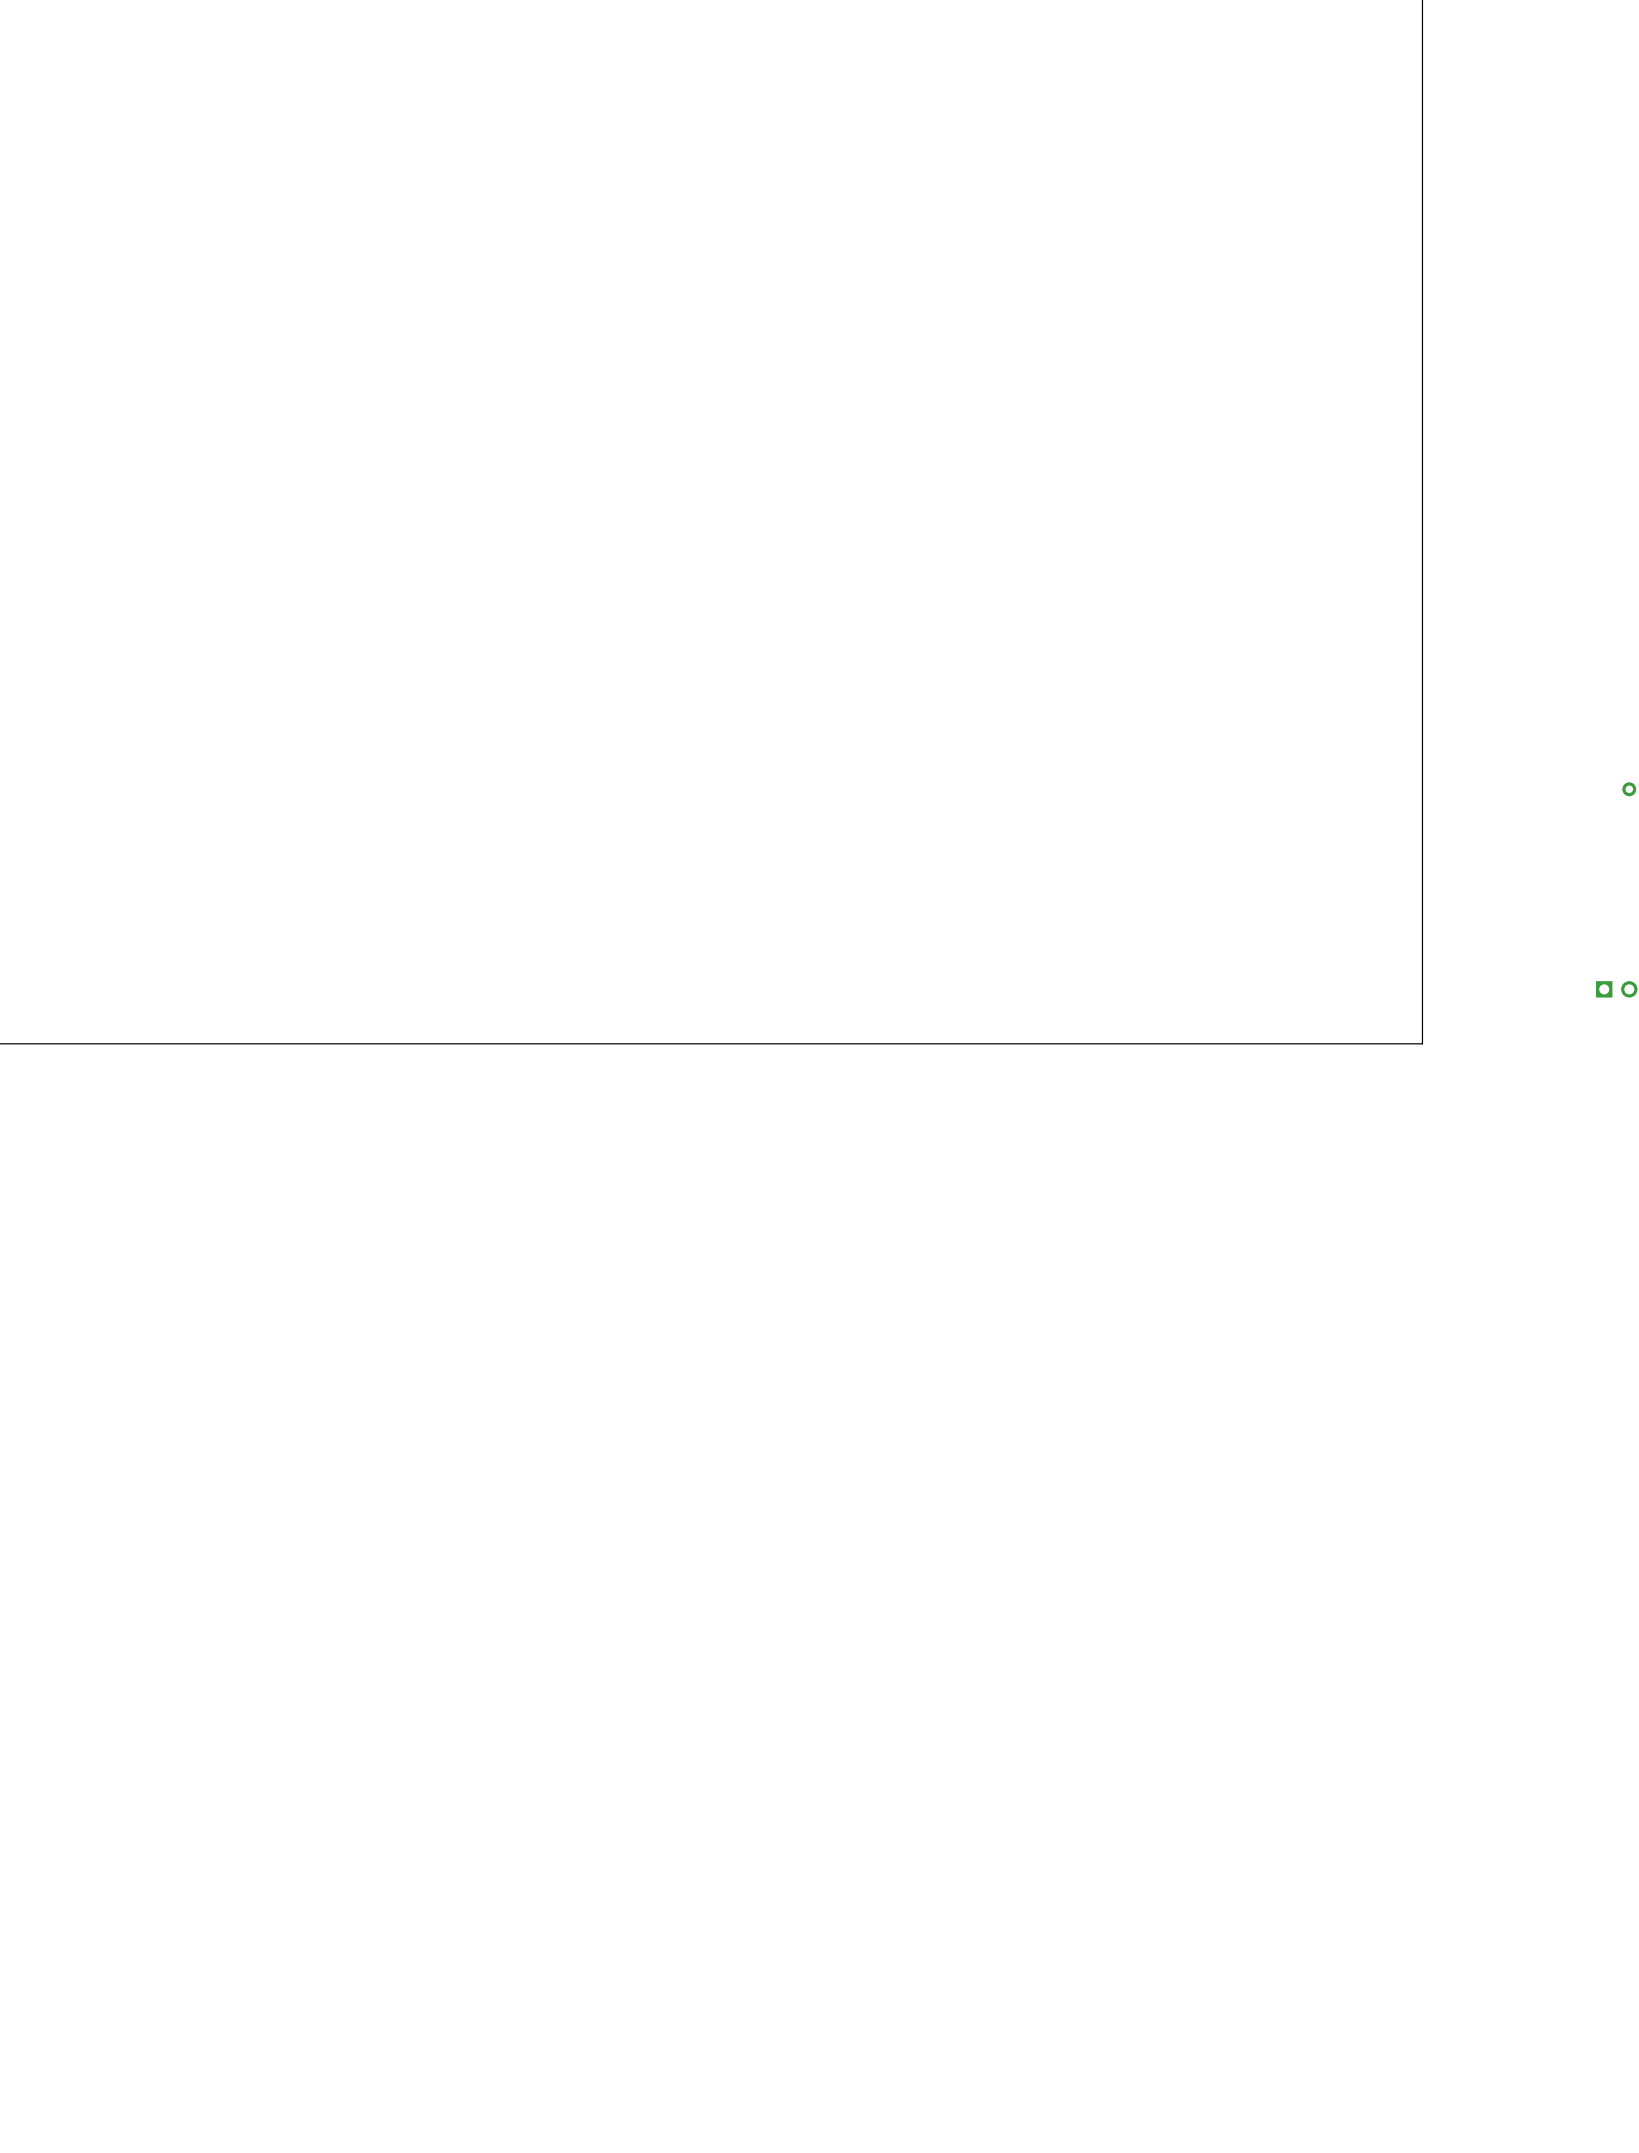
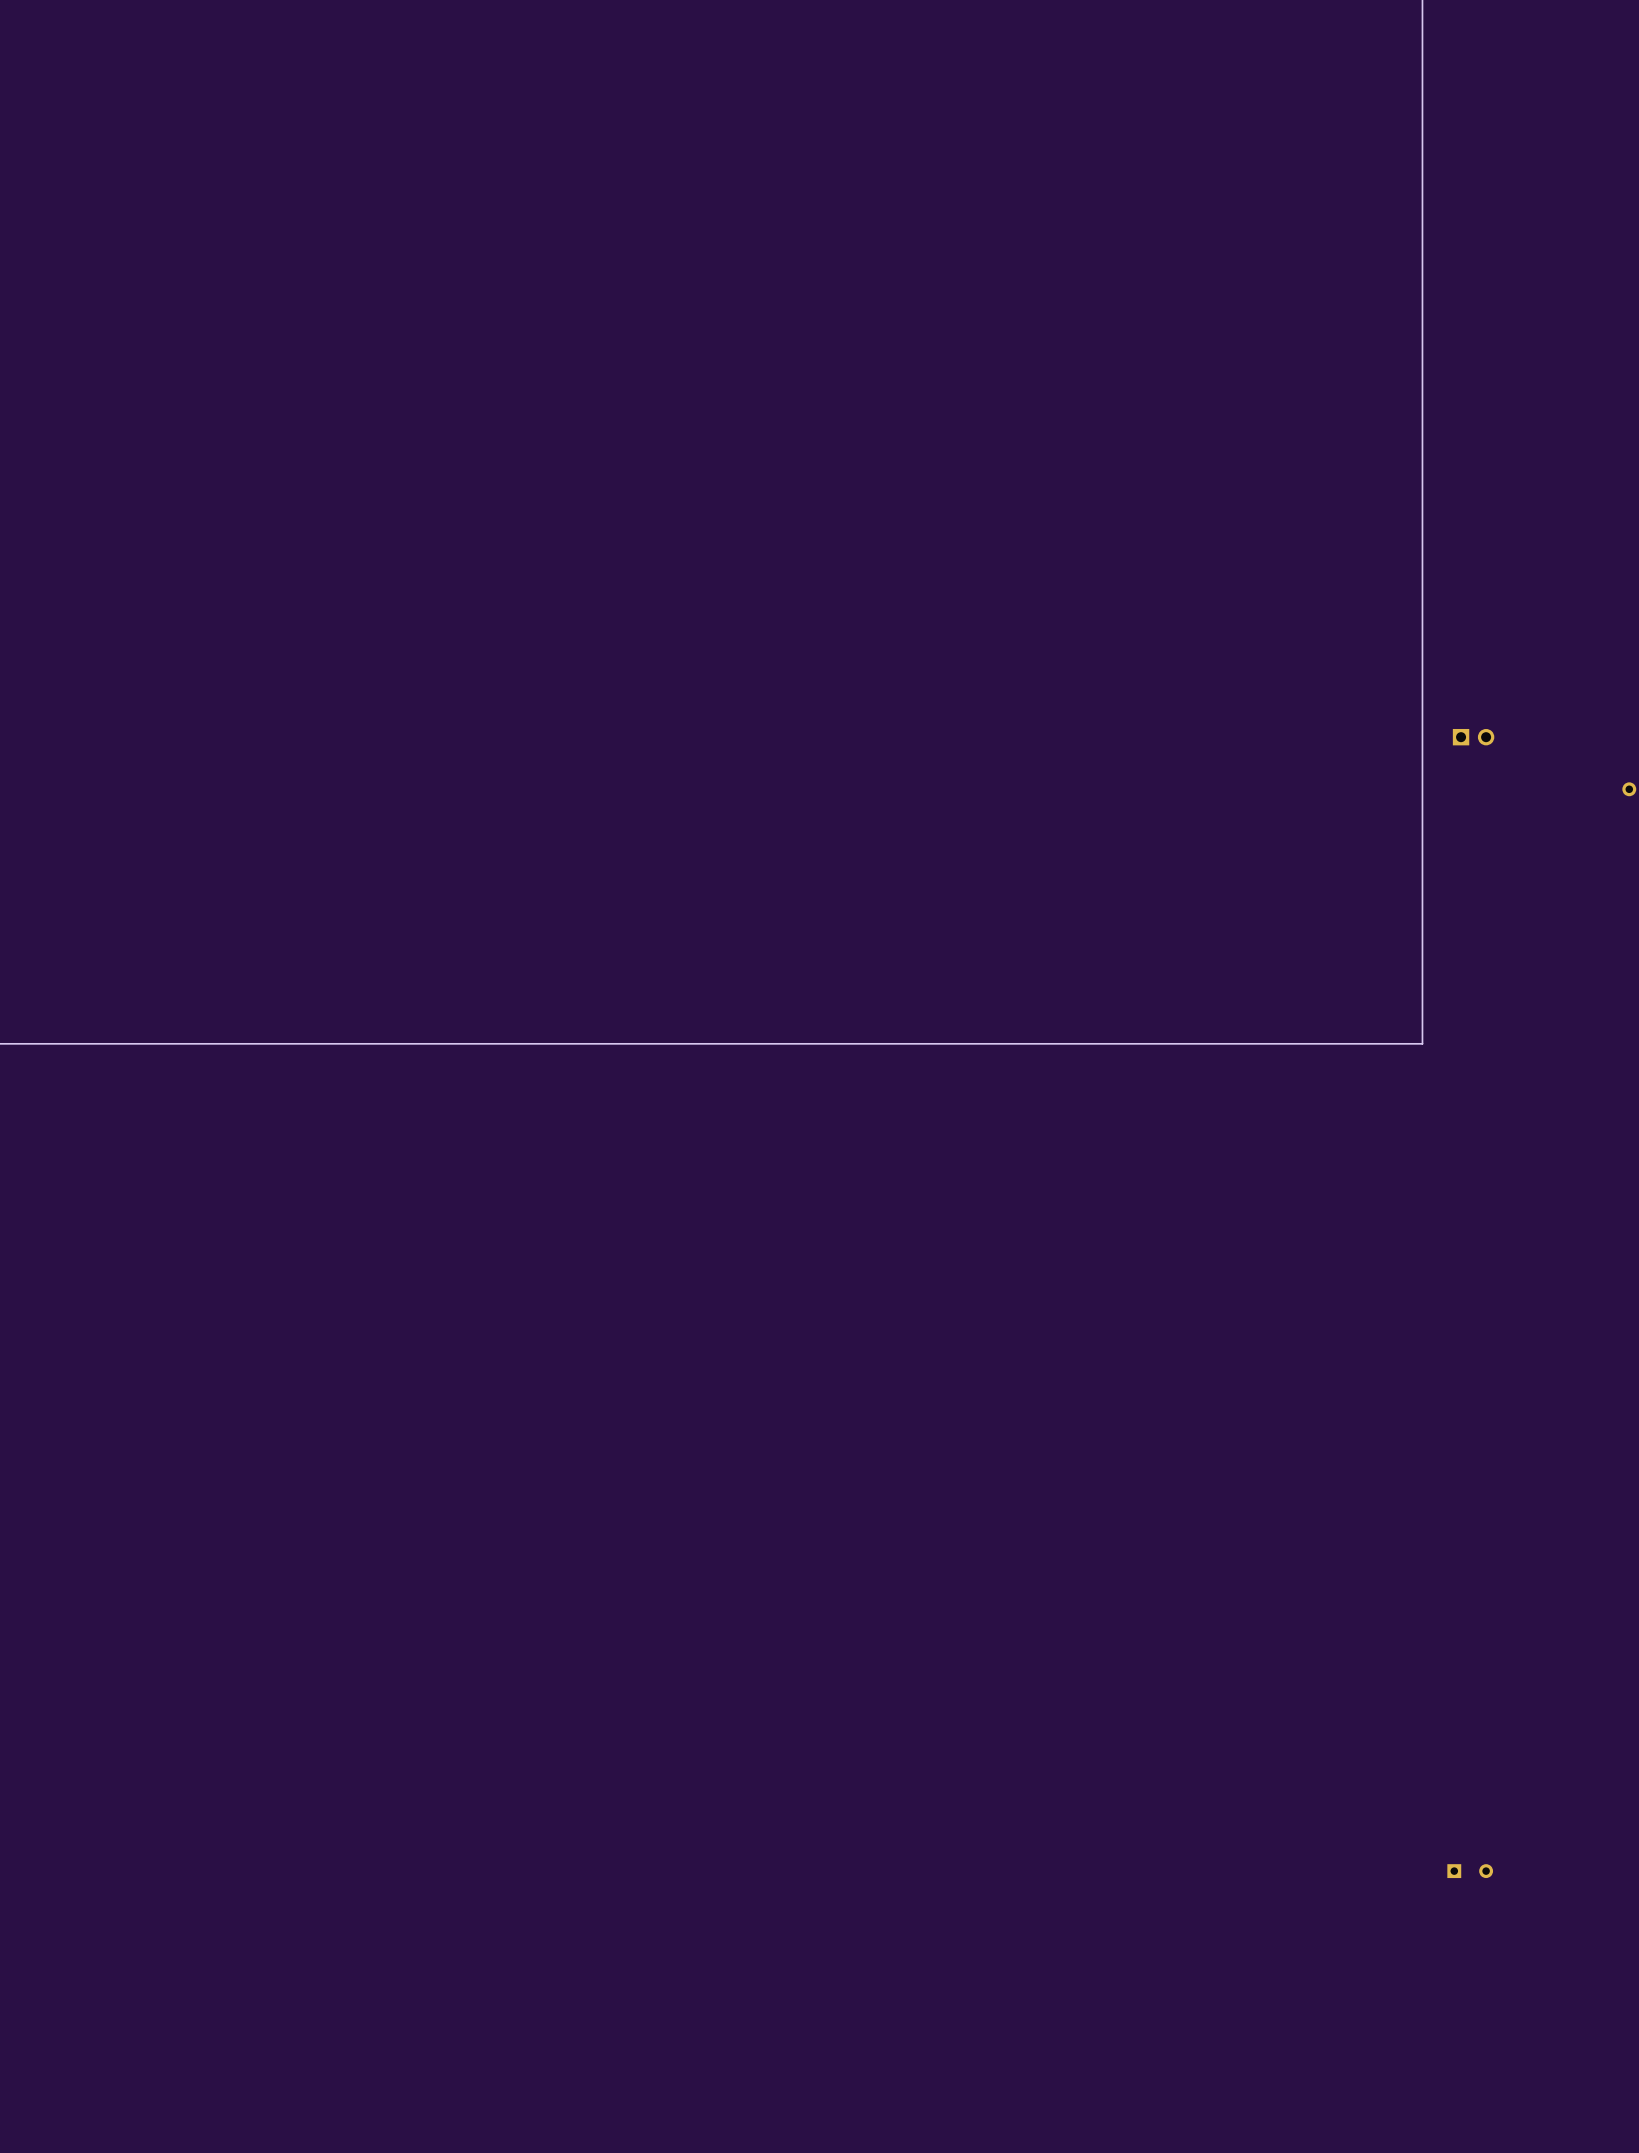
part position: (1616, 989) -> (1473, 737)
part: none -> (1470, 1871)

